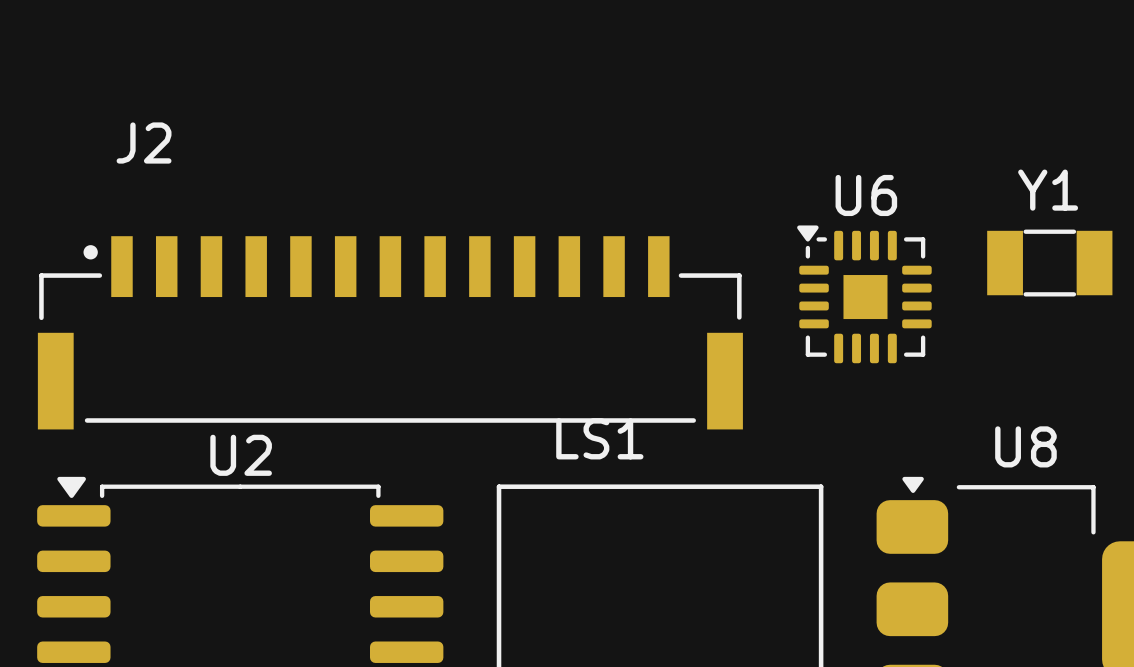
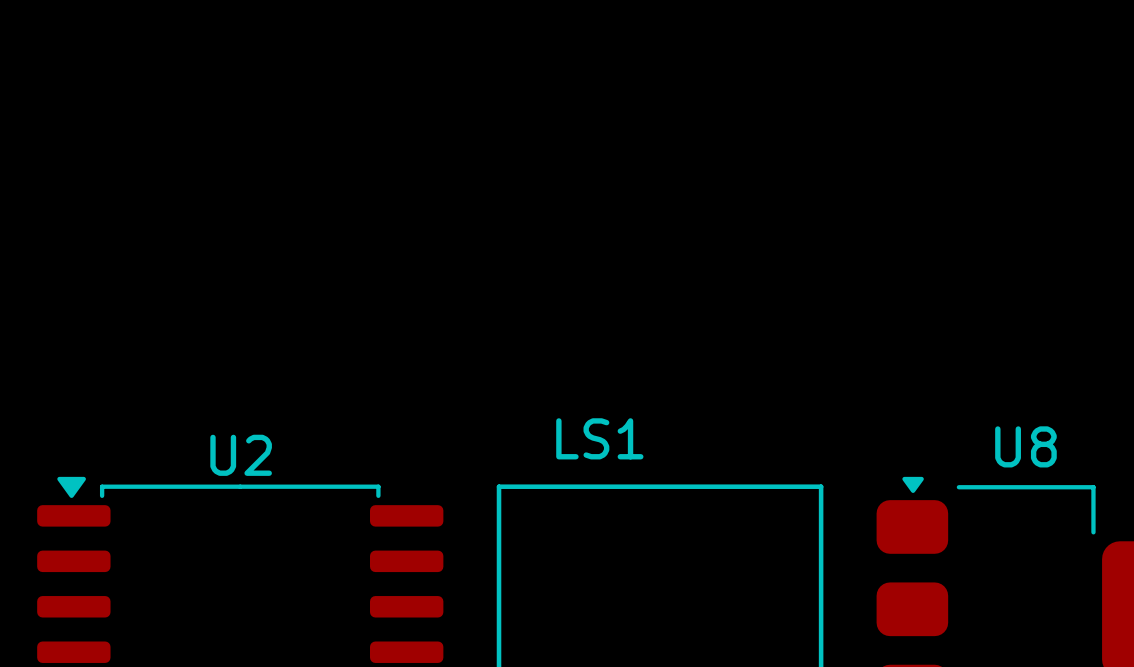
Y1: (1049, 263) -> none
U6: (864, 294) -> none
J2: (390, 332) -> none

